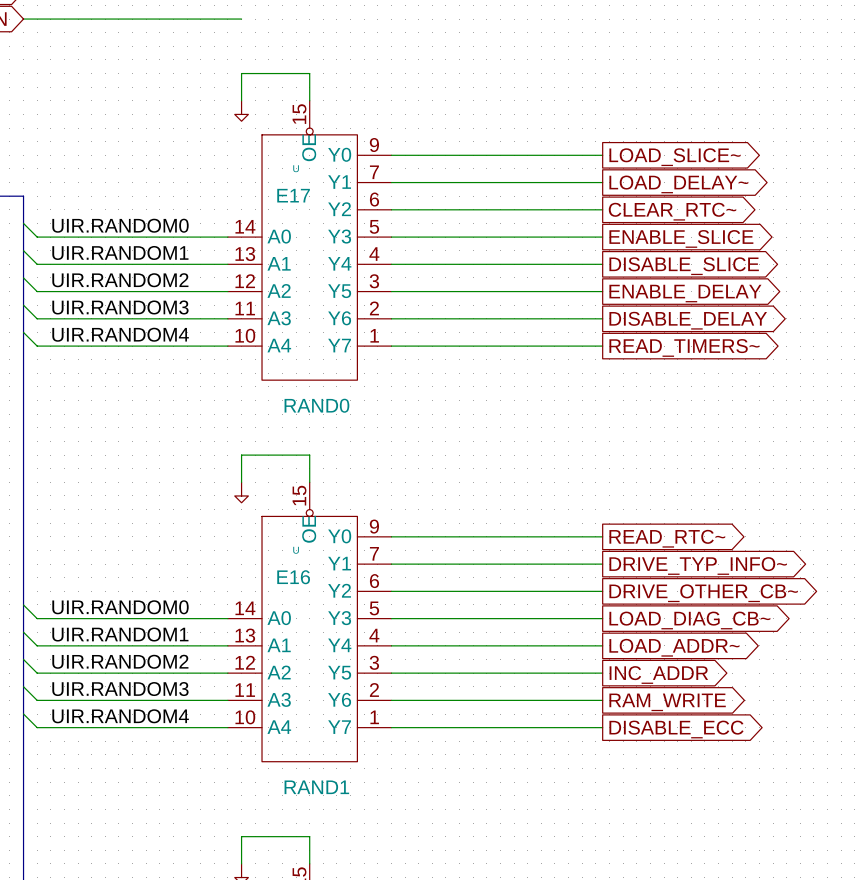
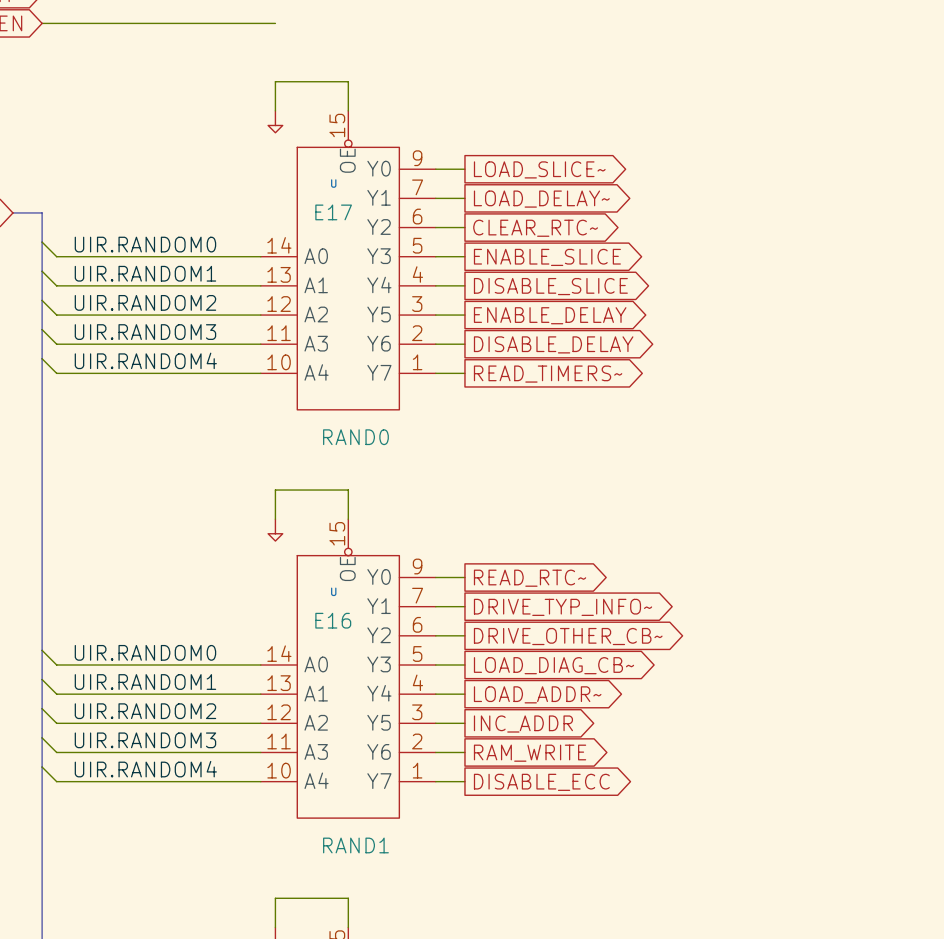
wire: (418, 155) (602, 155) -> none
global label: none -> LOAD_SLICE~ (539, 169)
global label: LOAD_SLICE~ (675, 157) -> none
wire: (418, 182) (602, 182) -> none
global label: none -> LOAD_DELAY~ (541, 199)
global label: LOAD_DELAY~ (678, 184) -> none
wire: (418, 209) (602, 209) -> none
global label: none -> CLEAR_RTC~ (535, 228)
global label: CLEAR_RTC~ (672, 211) -> none
wire: (418, 237) (602, 237) -> none
global label: none -> ENABLE_SLICE (547, 257)
global label: ENABLE_SLICE (681, 238) -> none
wire: (418, 264) (602, 264) -> none
global label: none -> DISABLE_SLICE (550, 286)
global label: DISABLE_SLICE (684, 266) -> none
wire: (418, 291) (602, 291) -> none
global label: none -> ENABLE_DELAY (550, 315)
global label: ENABLE_DELAY (685, 293) -> none
wire: (418, 318) (602, 318) -> none
global label: none -> DISABLE_DELAY (553, 344)
global label: DISABLE_DELAY (688, 320) -> none
wire: (418, 346) (602, 346) -> none
global label: none -> READ_TIMERS~ (548, 374)
global label: READ_TIMERS~ (684, 347) -> none
wire: (418, 536) (602, 536) -> none
global label: none -> READ_RTC~ (530, 578)
global label: READ_RTC~ (667, 538) -> none
wire: (418, 564) (602, 564) -> none
global label: none -> DRIVE_TYP_INFO~ (563, 607)
global label: DRIVE_TYP_INFO~ (698, 565) -> none
wire: (418, 591) (602, 591) -> none
global label: none -> DRIVE_OTHER_CB~ (568, 636)
global label: DRIVE_OTHER_CB~ (703, 593) -> none
wire: (418, 618) (602, 618) -> none
global label: none -> LOAD_DIAG_CB~ (553, 665)
global label: LOAD_DIAG_CB~ (689, 620) -> none
wire: (418, 645) (602, 645) -> none
global label: none -> LOAD_ADDR~ (537, 694)
global label: LOAD_ADDR~ (674, 647) -> none
wire: (418, 673) (602, 673) -> none
global label: none -> INC_ADDR (523, 724)
global label: INC_ADDR (658, 674) -> none
wire: (418, 700) (602, 700) -> none
global label: none -> RAM_WRITE (530, 753)
global label: RAM_WRITE (667, 702) -> none
wire: (418, 727) (602, 727) -> none
global label: none -> DISABLE_ECC (541, 782)
global label: DISABLE_ECC (676, 729) -> none

